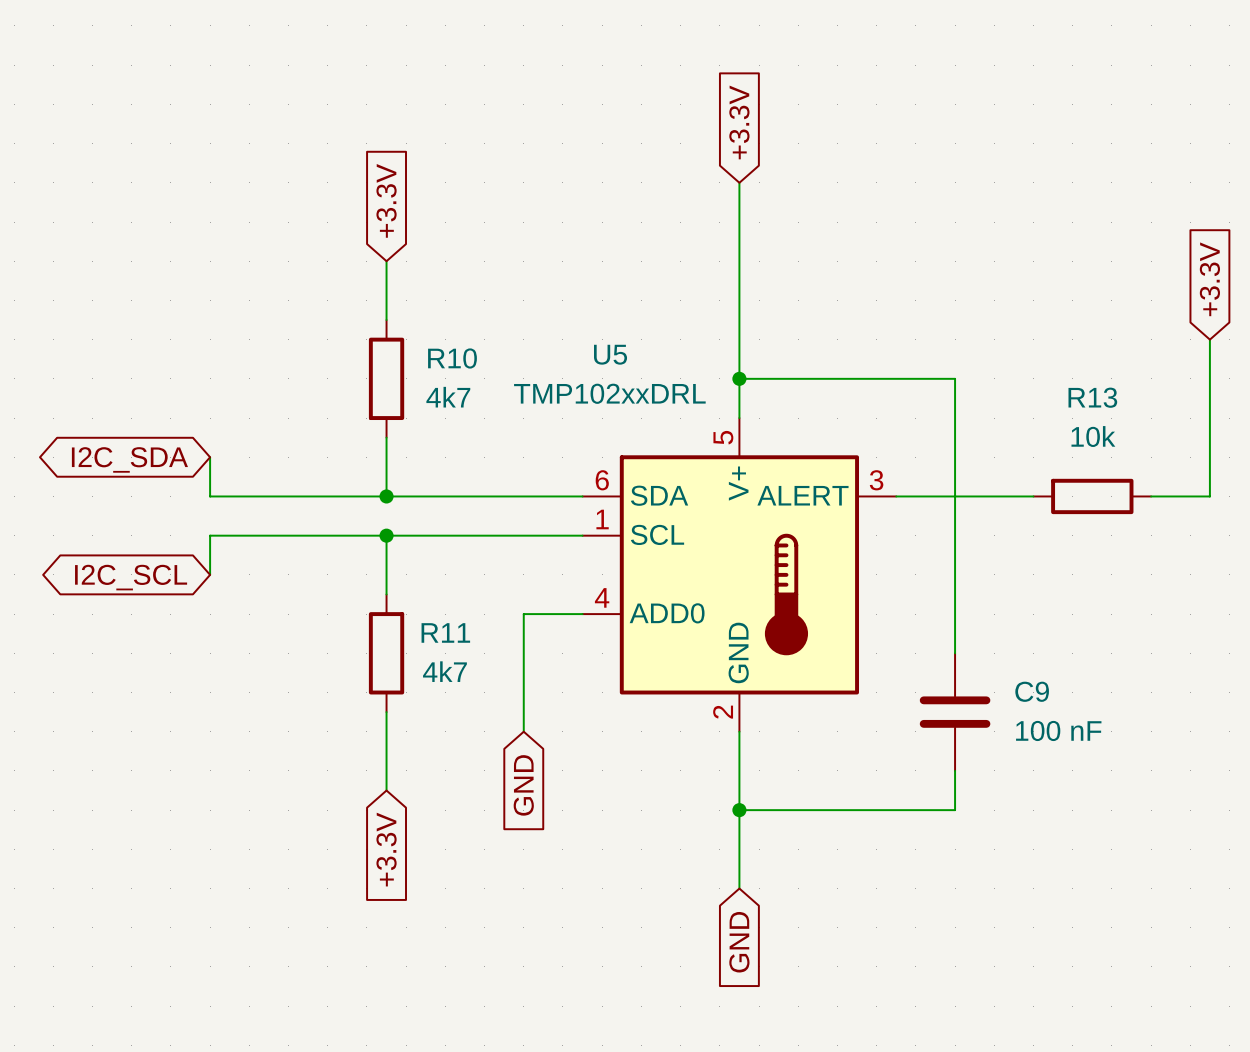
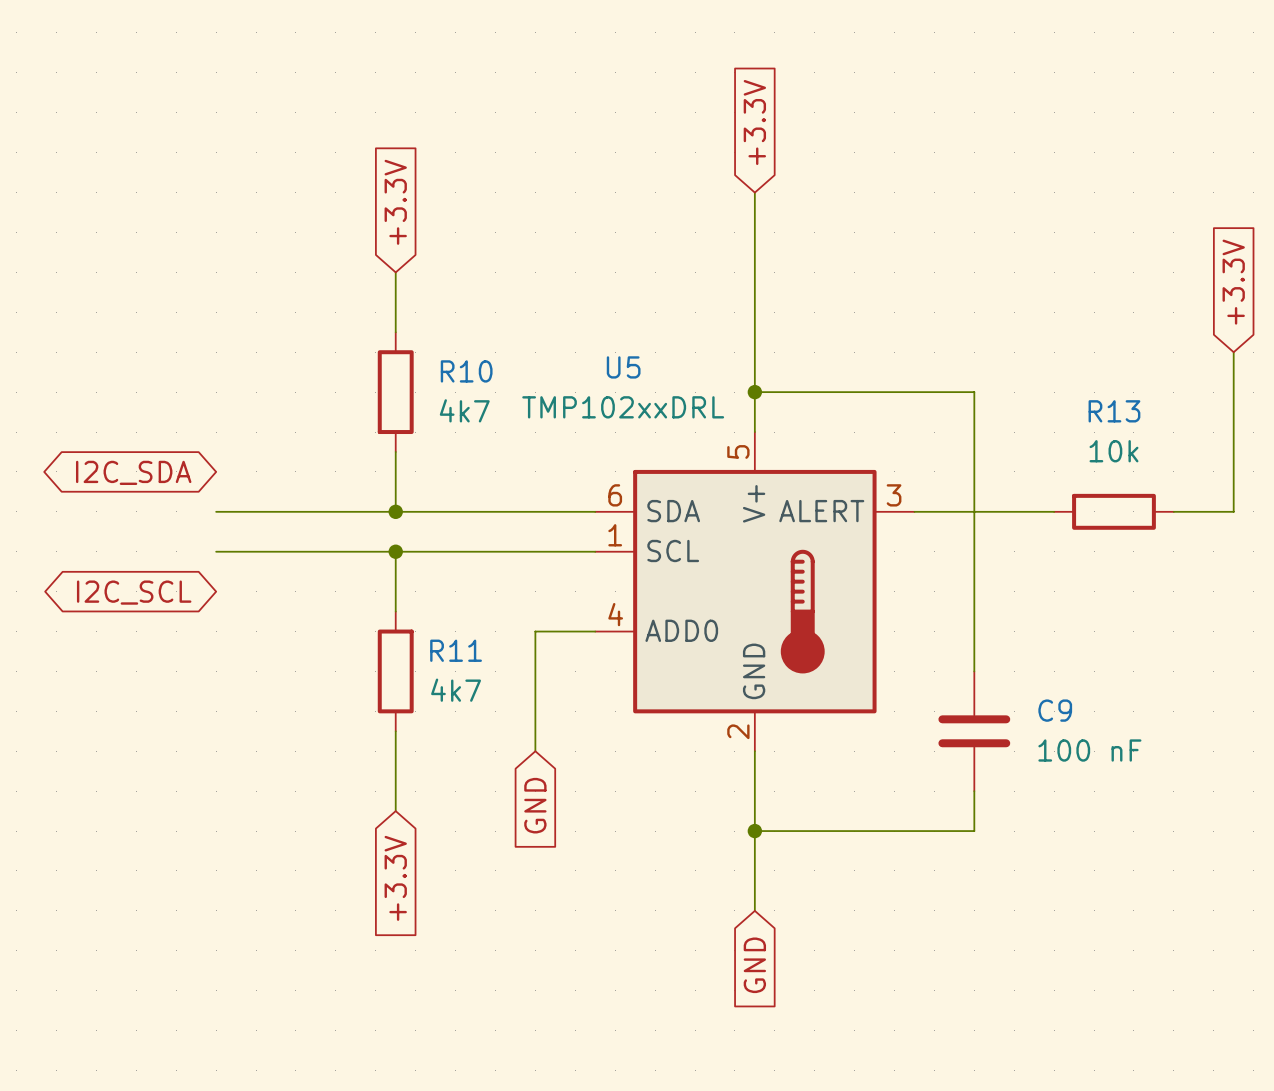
wire: (210, 457) (210, 496) -> none
wire: (210, 535) (210, 574) -> none

